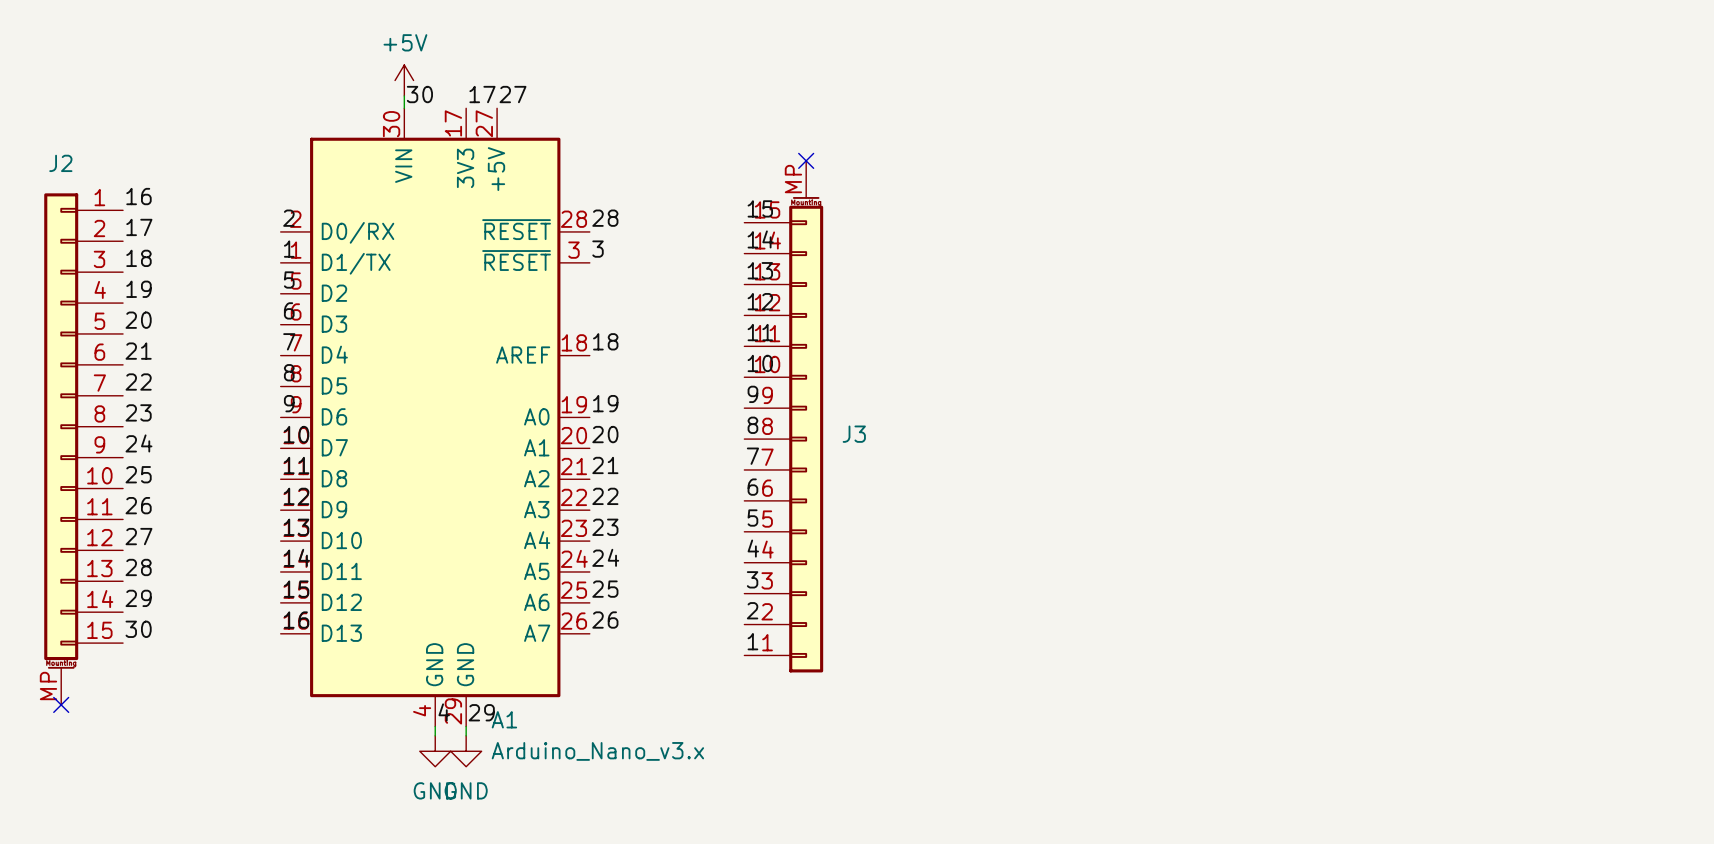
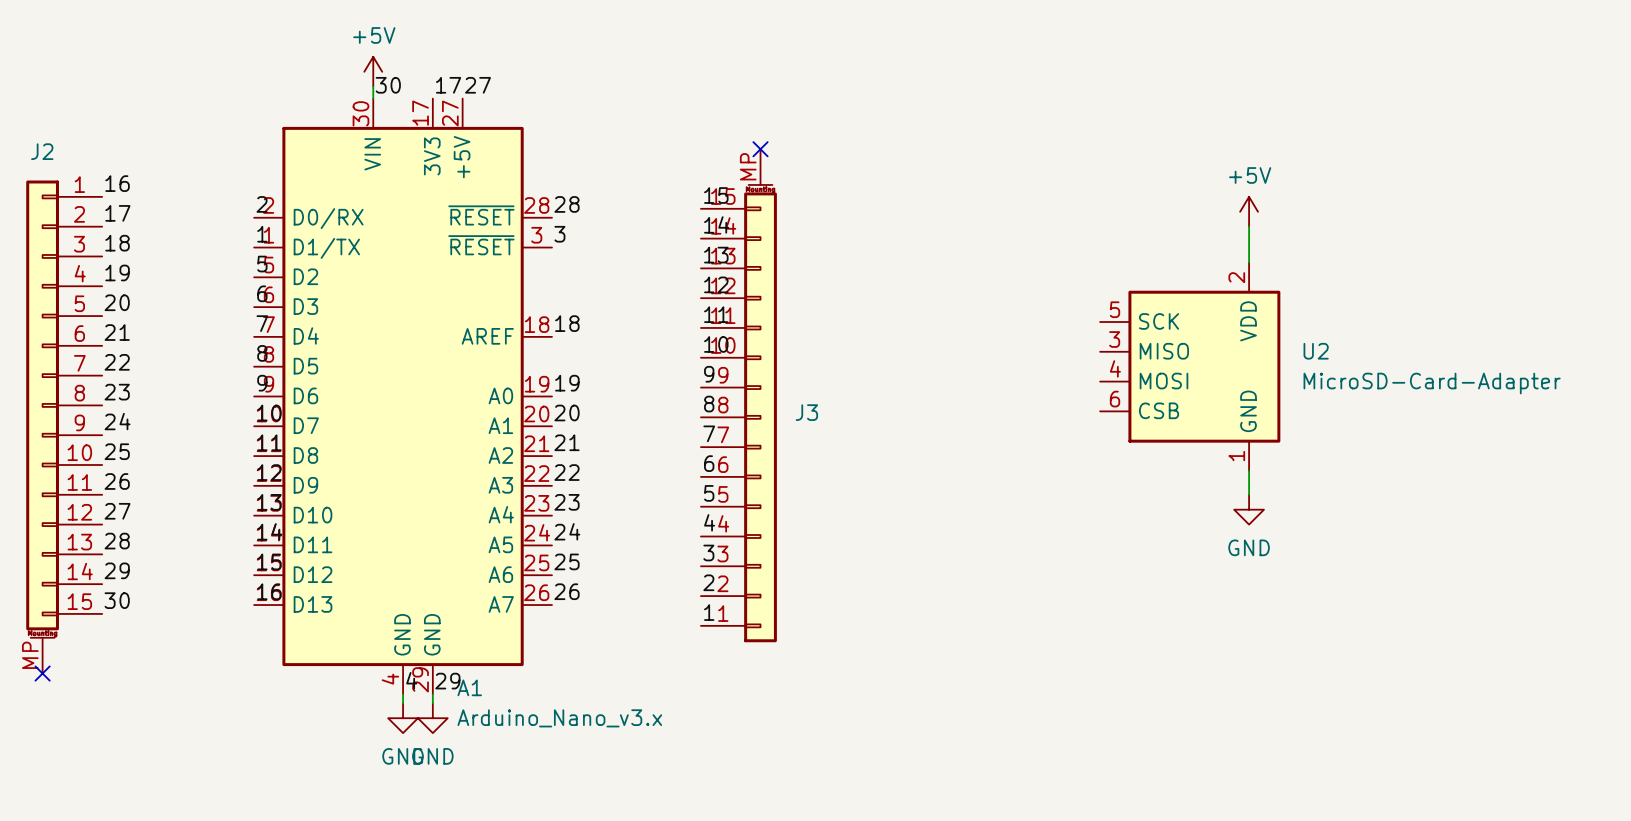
power symbol: none -> +5V (1249, 211)
wire: none -> (1249, 226) (1249, 262)
U2: none -> MicroSD-Card-Adapter (1190, 366)
wire: none -> (1249, 470) (1249, 494)
power symbol: none -> GND (1249, 509)

